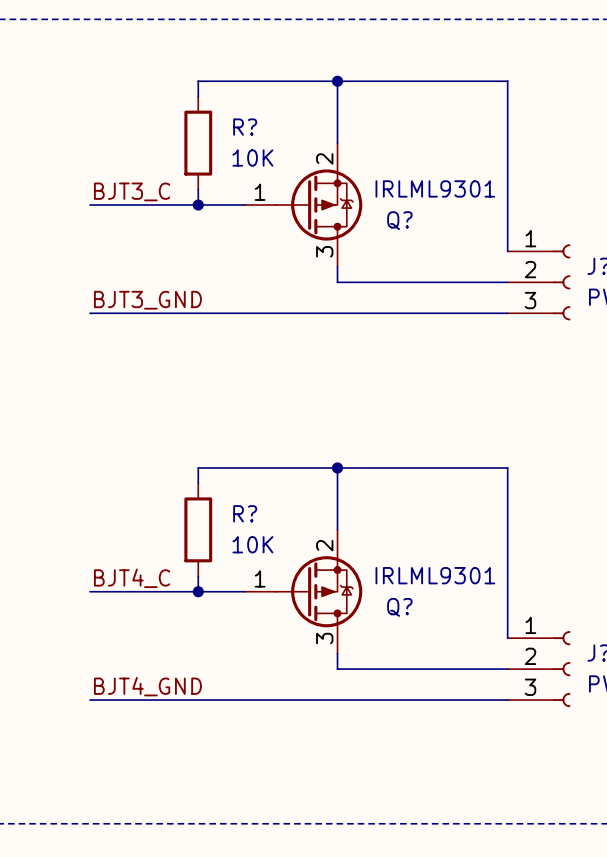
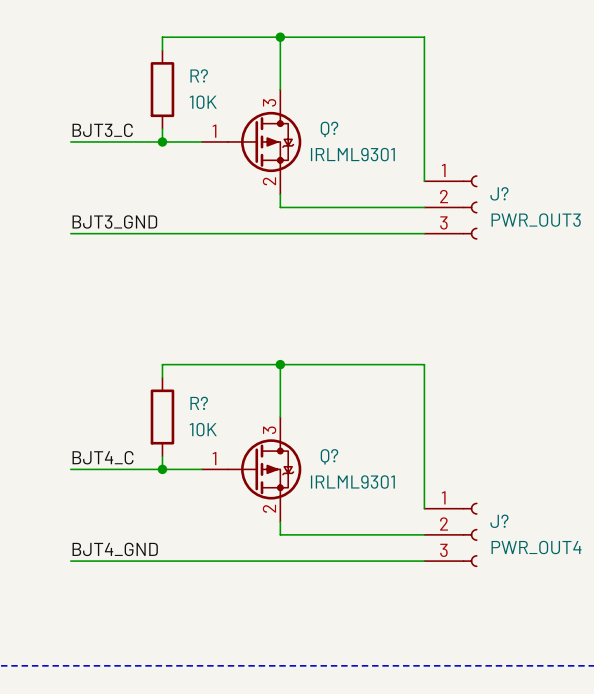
Q? flip: as is (318, 205) -> up-down (264, 141)
Q? flip: as is (318, 591) -> up-down (264, 469)

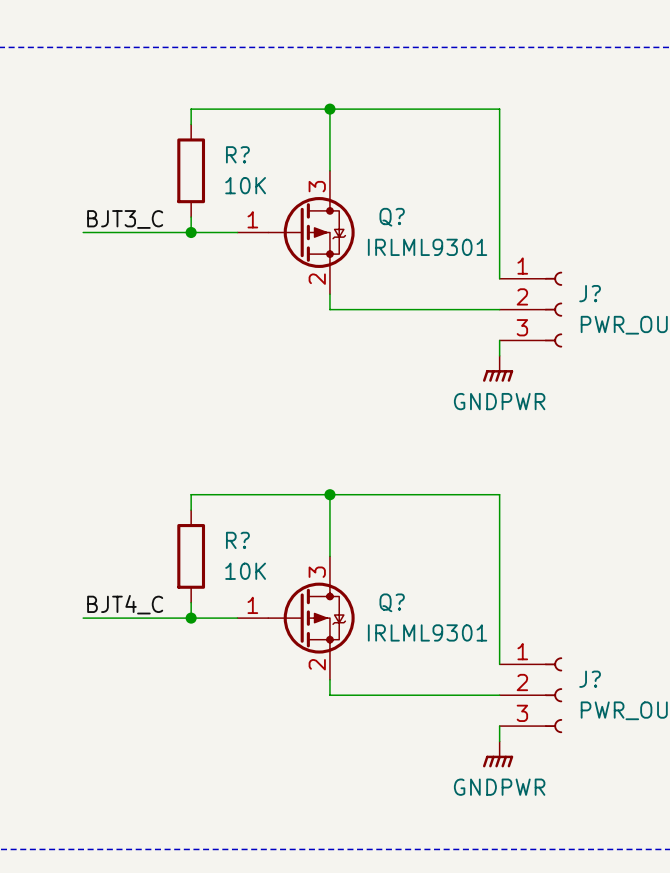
label: BJT3_GND (114, 221) -> none
wire: (70, 233) (424, 233) -> (499, 355) (499, 340)
power symbol: none -> GNDPWR (498, 368)
label: BJT4_GND (115, 549) -> none
wire: (70, 561) (424, 561) -> (499, 741) (499, 726)
power symbol: none -> GNDPWR (498, 754)

